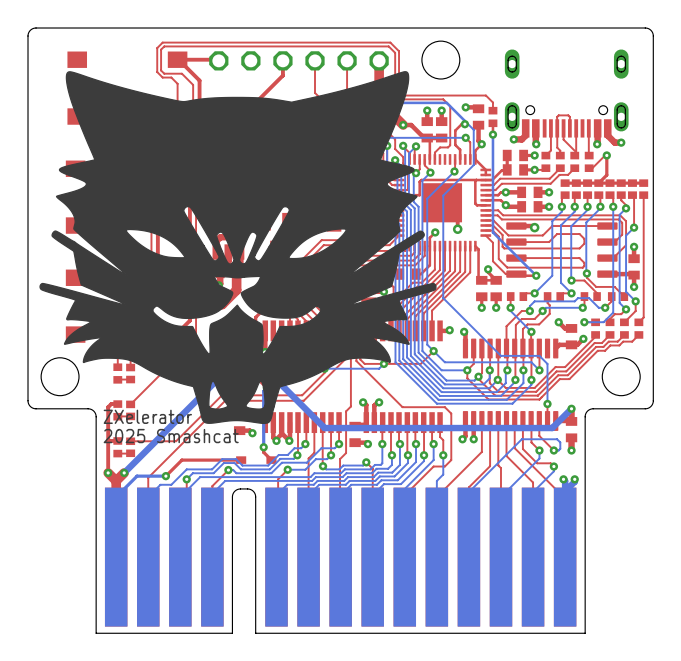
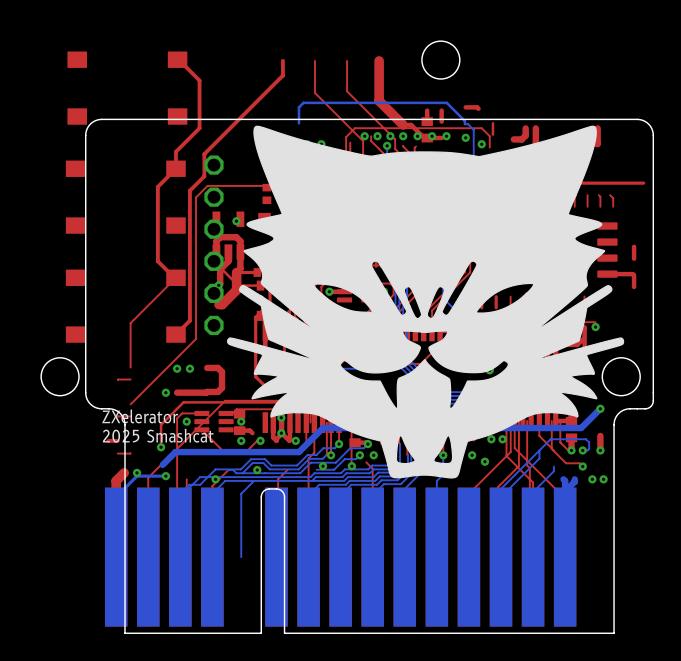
top track: (177, 59) (218, 60) -> none
part rotation: 0° (298, 60) -> 90° clockwise (213, 245)
part position: (298, 60) -> (213, 245)
part: (566, 93) -> none
via: (465, 107) -> none
via: (427, 110) -> none
via: (441, 110) -> none
top track: (492, 110) (492, 102) (485, 95) (404, 95) (399, 89) (399, 51) (390, 42) (162, 42) (157, 48) (157, 72) (162, 77) (171, 77) (177, 83) (177, 116) -> none
part: (478, 116) -> none
part: (492, 116) -> none
top track: (464, 124) (461, 124) (455, 130) (455, 144) (460, 149) (460, 159) -> none
via: (464, 124) -> none
via: (403, 125) -> none
top track: (478, 125) (478, 141) (481, 144) (475, 150) (475, 159) (485, 169) (485, 174) -> none
top track: (550, 128) (550, 150) (545, 155) -> none
top track: (557, 128) (557, 116) (568, 115) (569, 128) -> none
top track: (557, 128) (557, 147) (560, 150) (560, 155) -> none
top track: (563, 128) (563, 139) (576, 152) -> none
top track: (576, 128) (574, 155) -> none
top track: (588, 128) (589, 155) -> none
top track: (607, 128) (607, 135) (614, 142) (621, 142) -> none
part: (441, 129) -> none
bottom track: (492, 134) (492, 232) (536, 275) -> none
via: (492, 134) -> none
board edge: (653, 135) (653, 36) (651, 31) (646, 28) (36, 28) (30, 30) (28, 36) (28, 401) (30, 406) (34, 408) (89, 408) (95, 413) (96, 633) (125, 633) -> (653, 135) (648, 124) (637, 119) (101, 119) (90, 124) (85, 135) (85, 394) (91, 405) (97, 408) (116, 410) (122, 416) (124, 422) (125, 633)
via: none -> (364, 136)
via: none -> (377, 136)
via: none -> (390, 136)
via: none -> (403, 136)
via: none -> (417, 136)
via: none -> (432, 136)
via: none -> (446, 136)
top track: (465, 137) (470, 142) (470, 159) -> none
bottom track: (465, 137) (383, 137) (377, 144) (351, 144) (350, 142) -> none
top track: (427, 138) (429, 140) (429, 159) -> none
via: (513, 139) -> none
via: (621, 142) -> none
via: (536, 144) -> none
via: (597, 144) -> none
bottom track: (403, 145) (405, 147) (405, 204) (410, 209) (410, 355) (443, 388) (489, 388) (497, 379) -> none
via: (403, 145) -> none
bottom track: (416, 146) (408, 153) (408, 202) (414, 208) (414, 354) (444, 384) (483, 384) (489, 378) (489, 370) -> none
via: (416, 146) -> none
top track: none -> (489, 147) (489, 136) (481, 128) (355, 128) (346, 137) (346, 164) (350, 168) (350, 176)
part: (515, 155) -> none
via: (534, 155) -> none
via: (606, 155) -> none
top track: (434, 159) (434, 152) (440, 147) (448, 147) (450, 145) (450, 106) (443, 99) (403, 99) (395, 91) (395, 52) (388, 46) (164, 46) (161, 49) (161, 70) (164, 73) (181, 73) (193, 84) (193, 126) (151, 168) (151, 291) (117, 325) (117, 367) -> none
via: (395, 160) -> none
part: (545, 161) -> none
part: (560, 161) -> none
part: (574, 161) -> none
part: (589, 161) -> none
top track: (560, 168) (549, 178) (500, 178) (493, 185) (485, 185) -> none
top track: (574, 168) (568, 174) (559, 174) (550, 183) (501, 183) (495, 190) (485, 190) -> none
top track: (589, 168) (592, 168) (606, 155) (606, 175) (598, 183) -> none
part: (515, 169) -> none
via: (534, 169) -> none
bottom track: (454, 171) (427, 198) (427, 344) (444, 362) (531, 362) (539, 370) -> none
via: (454, 171) -> none
bottom track: (430, 172) (422, 180) (422, 351) (441, 370) (467, 370) -> none
bottom track: (416, 173) (413, 175) (413, 201) (418, 206) (418, 352) (446, 380) (474, 380) (478, 376) -> none
top track: (476, 180) (475, 203) (485, 205) -> none
part: (565, 189) -> none
part: (576, 189) -> none
part: (587, 189) -> none
part: (598, 189) -> none
part: (610, 189) -> none
part: (621, 189) -> none
part: (632, 189) -> none
part: (643, 189) -> none
via: (505, 192) -> none
top track: (521, 192) (500, 192) (498, 195) (485, 195) -> none
part: (529, 192) -> none
via: (549, 192) -> none
top track: (621, 195) (621, 200) (626, 205) (626, 208) -> none
top track: (632, 195) (634, 196) (634, 227) -> none
top track: (643, 195) (643, 317) (638, 322) -> none
top track: (485, 200) (500, 200) (507, 206) (521, 206) -> none
part: (442, 202) -> none
via: (505, 205) -> none
part: (529, 206) -> none
via: (549, 206) -> none
bottom track: (561, 206) (561, 211) (552, 221) (552, 275) (534, 293) -> none
via: (561, 206) -> none
bottom track: (574, 206) (574, 211) (560, 225) (560, 282) (571, 293) -> none
via: (574, 206) -> none
bottom track: (587, 206) (587, 209) (571, 226) (571, 280) -> none
via: (587, 206) -> none
bottom track: (600, 206) (586, 222) (586, 273) -> none
via: (600, 206) -> none
bottom track: (613, 206) (613, 312) (603, 322) (584, 322) -> none
via: (613, 206) -> none
bottom track: (626, 208) (619, 214) (619, 302) (626, 309) -> none
via: (626, 208) -> none
top track: (485, 210) (498, 210) (503, 215) (620, 215) (626, 221) (626, 245) (613, 258) (607, 258) -> none
top track: (485, 215) (497, 215) (501, 219) (618, 219) (622, 222) (622, 234) (614, 242) (607, 242) -> none
top track: (485, 220) (493, 220) (508, 235) (542, 235) (552, 226) (607, 226) -> none
via: none -> (236, 221)
top track: (485, 225) (493, 225) (502, 235) (504, 248) (579, 248) (584, 243) (584, 238) (579, 234) (557, 234) (549, 242) (516, 242) -> none
via: (534, 227) -> none
bottom track: (634, 227) (626, 235) (626, 291) (635, 301) -> none
via: (634, 227) -> none
top track: (485, 230) (492, 230) (498, 236) (498, 259) (507, 267) (527, 267) -> none
top track: (434, 246) (434, 269) (421, 282) (412, 282) (374, 321) (374, 330) -> none
top track: (450, 246) (450, 270) (399, 320) (399, 330) -> none
top track: (455, 246) (455, 271) (407, 318) (407, 330) -> none
top track: (460, 246) (460, 271) (415, 316) (415, 330) -> none
via: (634, 246) -> none
drawing position: (238, 247) -> (425, 302)
top track: none -> (213, 261) (238, 285) (260, 285)
part: (634, 266) -> none
via: (488, 269) -> none
top track: (586, 273) (586, 277) (596, 286) (614, 286) (624, 296) -> none
via: (586, 273) -> none
via: (536, 275) -> none
top track: (571, 280) (584, 280) (597, 293) (597, 296) -> none
via: (571, 280) -> none
via: (634, 286) -> none
part: (481, 288) -> none
part: (496, 288) -> none
via: (534, 293) -> none
via: (571, 293) -> none
part: (517, 296) -> none
top track: (547, 296) (549, 313) (539, 324) (527, 324) (522, 329) (523, 370) -> none
part: (553, 296) -> none
part: (590, 296) -> none
top track: (611, 296) (611, 301) (605, 307) -> none
part: (618, 296) -> none
top track: (344, 299) (344, 304) (350, 311) (350, 406) (346, 411) (346, 453) (340, 459) (340, 557) -> none
top track: (368, 299) (356, 311) (356, 361) (402, 407) (444, 407) (451, 413) (451, 460) (444, 466) (433, 466) (404, 495) (404, 557) -> none
part: none -> (260, 300)
top track: (635, 301) (635, 311) (624, 322) -> none
via: (635, 301) -> none
top track: none -> (295, 304) (284, 315) (284, 355) (292, 363) (292, 399) (289, 402) (183, 402) (161, 424) (161, 447)
via: (481, 307) -> none
via: (496, 307) -> none
bottom track: (510, 307) (510, 310) (531, 331) -> none
via: (510, 307) -> none
bottom track: (582, 307) (545, 307) (542, 310) -> none
bottom track: (605, 307) (598, 307) (589, 298) (577, 298) (574, 301) (534, 301) (529, 306) (529, 310) -> none
via: (605, 307) -> none
top track: (626, 309) (621, 314) (614, 314) (610, 319) (610, 322) -> none
via: (626, 309) -> none
top track: (529, 310) (521, 310) (506, 326) (507, 370) -> none
top track: (542, 310) (534, 319) (521, 319) (515, 324) (515, 379) -> none
via: (542, 310) -> none
via: (584, 322) -> none
top track: none -> (584, 326) (584, 348)
via: none -> (595, 327)
part: (595, 328) -> none
part: (610, 328) -> none
part: (624, 328) -> none
part: (638, 328) -> none
via: (449, 330) -> none
via: (464, 331) -> none
via: (531, 331) -> none
top track: (595, 334) (565, 367) (555, 367) (534, 387) (505, 387) (497, 379) (498, 348) -> none
top track: (610, 334) (601, 343) (594, 343) (566, 371) (556, 371) (536, 391) (498, 391) (489, 383) (490, 348) -> none
top track: (624, 334) (617, 341) (608, 341) (603, 346) (596, 346) (567, 375) (558, 375) (537, 395) (495, 395) (478, 378) (482, 373) (481, 348) -> none
top track: (638, 334) (632, 341) (623, 341) (619, 345) (610, 345) (605, 350) (597, 350) (569, 379) (559, 379) (539, 399) (488, 399) (467, 378) (467, 370) (473, 363) (473, 348) -> none
part: (571, 336) -> none
via: (583, 338) -> none
via: (433, 351) -> none
via: (383, 363) -> none
top track: none -> (207, 367) (218, 367) (222, 371) (222, 387) (218, 391) (177, 392)
via: none -> (177, 368)
via: none -> (189, 368)
top track: (324, 368) (324, 372) (302, 395) (222, 395) (176, 441) (130, 441) -> none
via: (467, 370) -> none
via: (507, 370) -> none
part: (117, 373) -> none
part: (130, 373) -> none
via: (478, 376) -> none
via: (497, 379) -> none
via: (515, 379) -> none
bottom track: (266, 387) (263, 391) (263, 447) -> none
via: none -> (165, 392)
via: (363, 402) -> none
top track: (117, 403) (111, 403) (108, 407) (108, 472) (116, 480) -> none
via: (547, 403) -> none
bottom track: (571, 408) (552, 428) -> (600, 408) (581, 428) (552, 428)
via: none -> (600, 408)
board edge: (630, 408) (592, 408) (585, 414) (585, 633) -> (630, 408) (620, 412) (614, 422) (614, 633) (585, 633)
part: (117, 410) -> none
part: (130, 410) -> none
top track: none -> (201, 413) (182, 413) (177, 418) (177, 557)
top track: none -> (226, 413) (232, 413) (236, 409) (307, 409) (310, 412) (310, 422)
via: none -> (281, 417)
top track: (481, 420) (481, 451) (436, 496) (436, 557) -> (510, 420) (510, 451) (465, 496) (465, 557)
top track: (490, 420) (490, 466) (468, 487) (468, 557) -> (518, 420) (518, 466) (497, 487) (497, 557)
top track: (498, 420) (498, 465) (500, 468) (500, 557) -> (527, 420) (527, 465) (529, 468) (529, 557)
top track: (522, 420) (522, 449) (537, 463) (550, 463) (553, 466) -> (551, 420) (551, 449) (566, 463) (579, 463) (582, 466)
top track: (531, 420) (531, 442) (539, 450) -> (559, 420) (560, 442) (568, 450)
via: none -> (186, 421)
part: none -> (213, 421)
via: none -> (241, 421)
top track: (298, 422) (297, 455) -> (326, 422) (326, 455)
top track: (322, 422) (323, 466) -> (351, 422) (351, 466)
bottom track: (324, 428) (271, 375) (222, 375) (124, 472) -> (324, 428) (298, 452) (175, 452) (162, 464)
top track: none -> (201, 429) (224, 452) (246, 452) (257, 440) (260, 440)
via: (252, 433) -> none
via: none -> (281, 433)
top track: none -> (600, 435) (600, 450)
via: (473, 439) -> none
via: none -> (491, 439)
via: none -> (502, 439)
bottom track: (550, 439) (521, 439) (468, 492) (468, 557) -> (550, 439) (497, 492) (497, 557)
bottom track: (557, 439) (560, 442) (560, 448) (553, 450) -> (557, 439) (585, 439) (589, 442) (589, 448) (582, 450)
via: none -> (241, 440)
via: none -> (260, 440)
via: (276, 440) -> none
via: (289, 440) -> none
via: none -> (295, 440)
bottom track: (305, 444) (301, 448) (294, 448) (287, 455) (278, 455) (268, 465) (242, 465) (236, 459) (222, 459) (212, 469) (186, 469) (171, 484) (160, 484) (148, 496) (148, 557) -> none
via: (305, 444) -> none
bottom track: (382, 444) (382, 463) (368, 469) -> (395, 462) (391, 465) (372, 465) (368, 469)
via: (382, 444) -> none
via: (399, 444) -> none
part: (117, 447) -> none
part: (130, 447) -> none
via: none -> (161, 447)
top track: (263, 447) (263, 452) (271, 460) -> none
via: (263, 447) -> none
bottom track: (323, 448) (306, 462) (281, 462) (271, 473) -> (367, 444) (363, 448) (350, 448) (335, 462) (310, 462) (300, 473) (271, 473)
via: (539, 450) -> none
via: (553, 450) -> none
via: none -> (582, 450)
via: none -> (600, 450)
bottom track: (297, 455) (293, 458) (280, 458) (269, 469) (240, 469) -> (323, 448) (316, 455) (307, 455) (297, 465) (271, 465) (265, 459) (251, 459) (240, 469)
via: (297, 455) -> none
bottom track: none -> (326, 455) (322, 458) (309, 458) (298, 469) (269, 469) (263, 463) (252, 463) (242, 473)
bottom track: (331, 455) (327, 459) (315, 459) (305, 469) (287, 469) -> (359, 455) (356, 459) (344, 459) (334, 469) (316, 469)
via: none -> (359, 455)
via: none -> (373, 455)
bottom track: (391, 455) (391, 464) (388, 468) (376, 468) (369, 473) -> (411, 444) (409, 464) (403, 464) (399, 469) (373, 469) (369, 473)
via: (391, 455) -> none
via: (407, 455) -> none
via: none -> (472, 455)
top track: (241, 460) (181, 460) (165, 476) -> none
part: (256, 460) -> none
via: none -> (484, 461)
bottom track: (366, 462) (363, 465) (343, 465) (339, 469) (326, 469) (323, 466) -> none
via: (366, 462) -> none
via: none -> (351, 466)
via: (553, 466) -> none
via: none -> (582, 466)
bottom track: (240, 469) (234, 463) (223, 463) (213, 473) (192, 473) (186, 479) -> (240, 469) (215, 469) (200, 484) (189, 484) (177, 496) (177, 557)
via: (287, 469) -> none
via: (228, 470) -> none
via: none -> (257, 470)
via: (108, 472) -> none
via position: (124, 472) -> (137, 472)
via: (186, 479) -> none
via: none -> (215, 479)
via: (563, 479) -> none
via: (574, 479) -> none
via: none -> (592, 479)
via: none -> (603, 479)
bottom track: none -> (254, 480) (241, 493) (241, 557)
bottom track: (317, 480) (313, 484) (287, 484) (276, 495) (276, 557) -> (317, 480) (312, 480)
board edge: (255, 633) (255, 496) (253, 491) (247, 488) (237, 489) (232, 495) (232, 633) -> (255, 633) (232, 633)
board edge: (284, 633) (261, 633) -> (284, 633) (284, 496) (282, 491) (276, 488) (266, 489) (261, 495) (261, 633)

